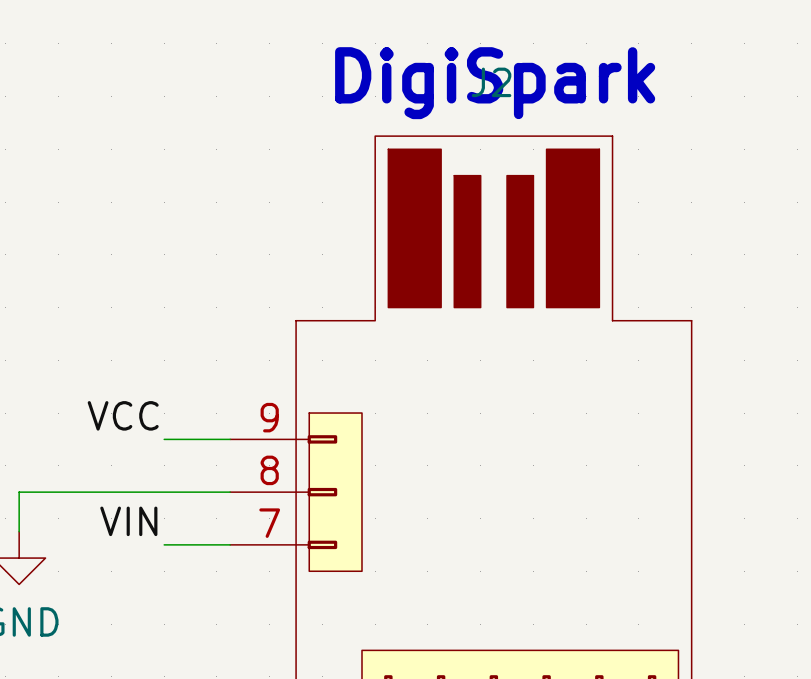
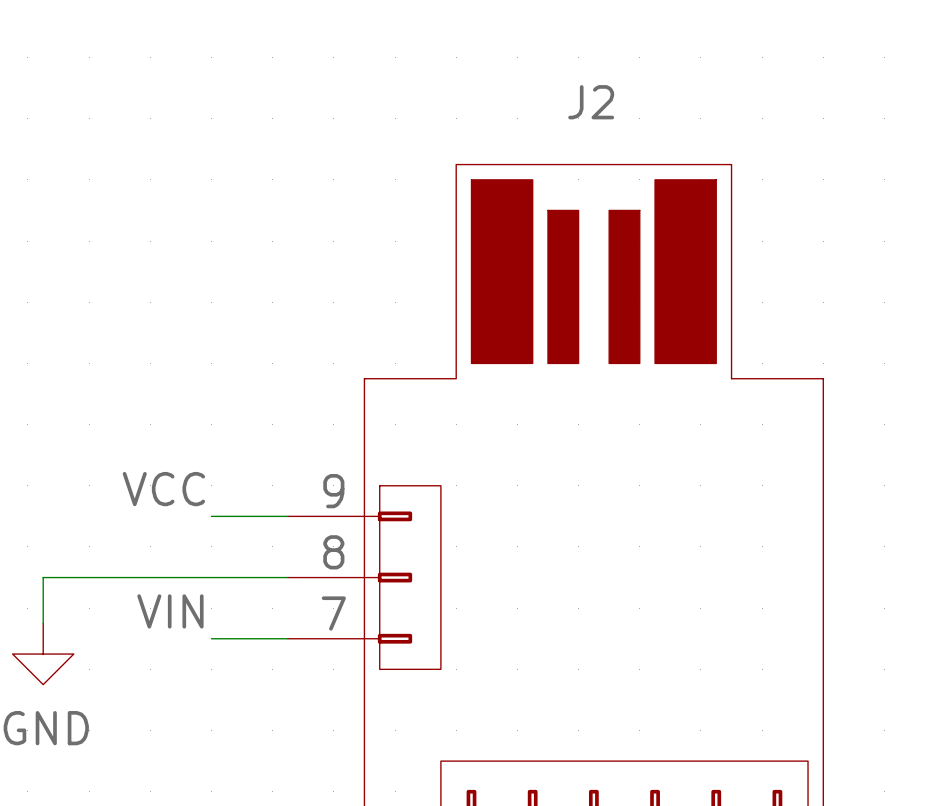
text: DigiSpark (495, 83) -> none

